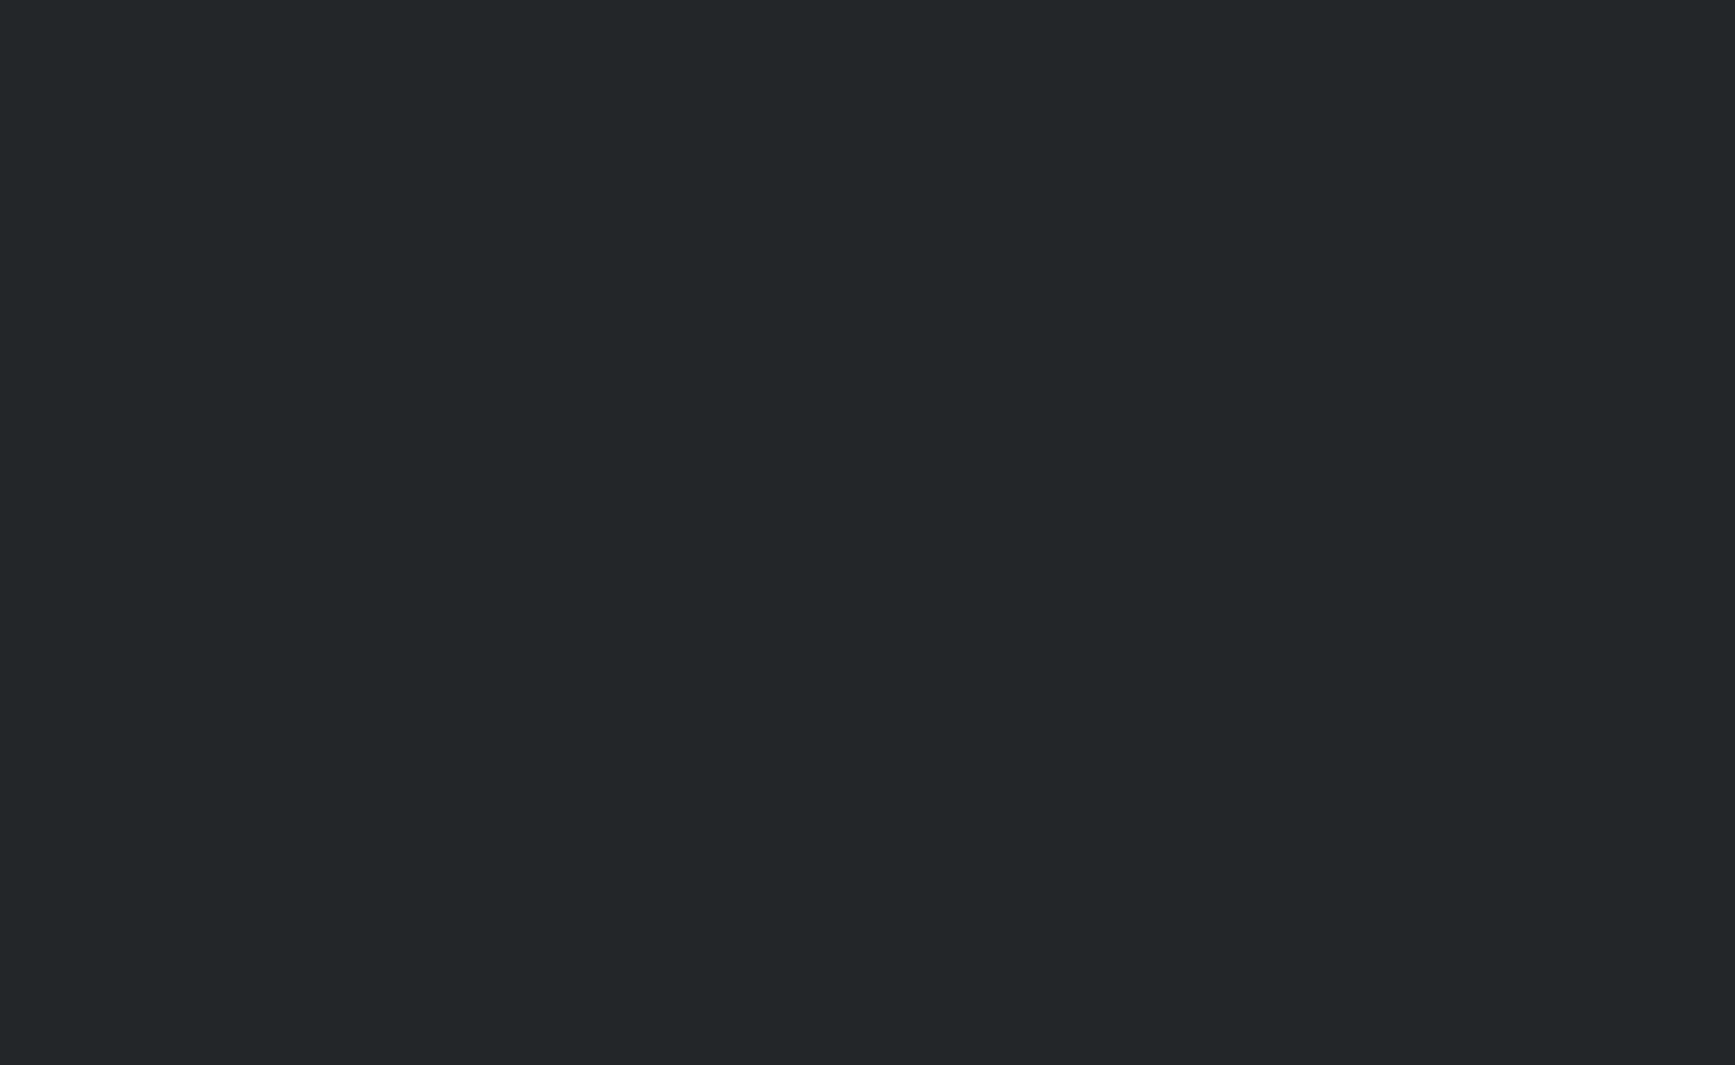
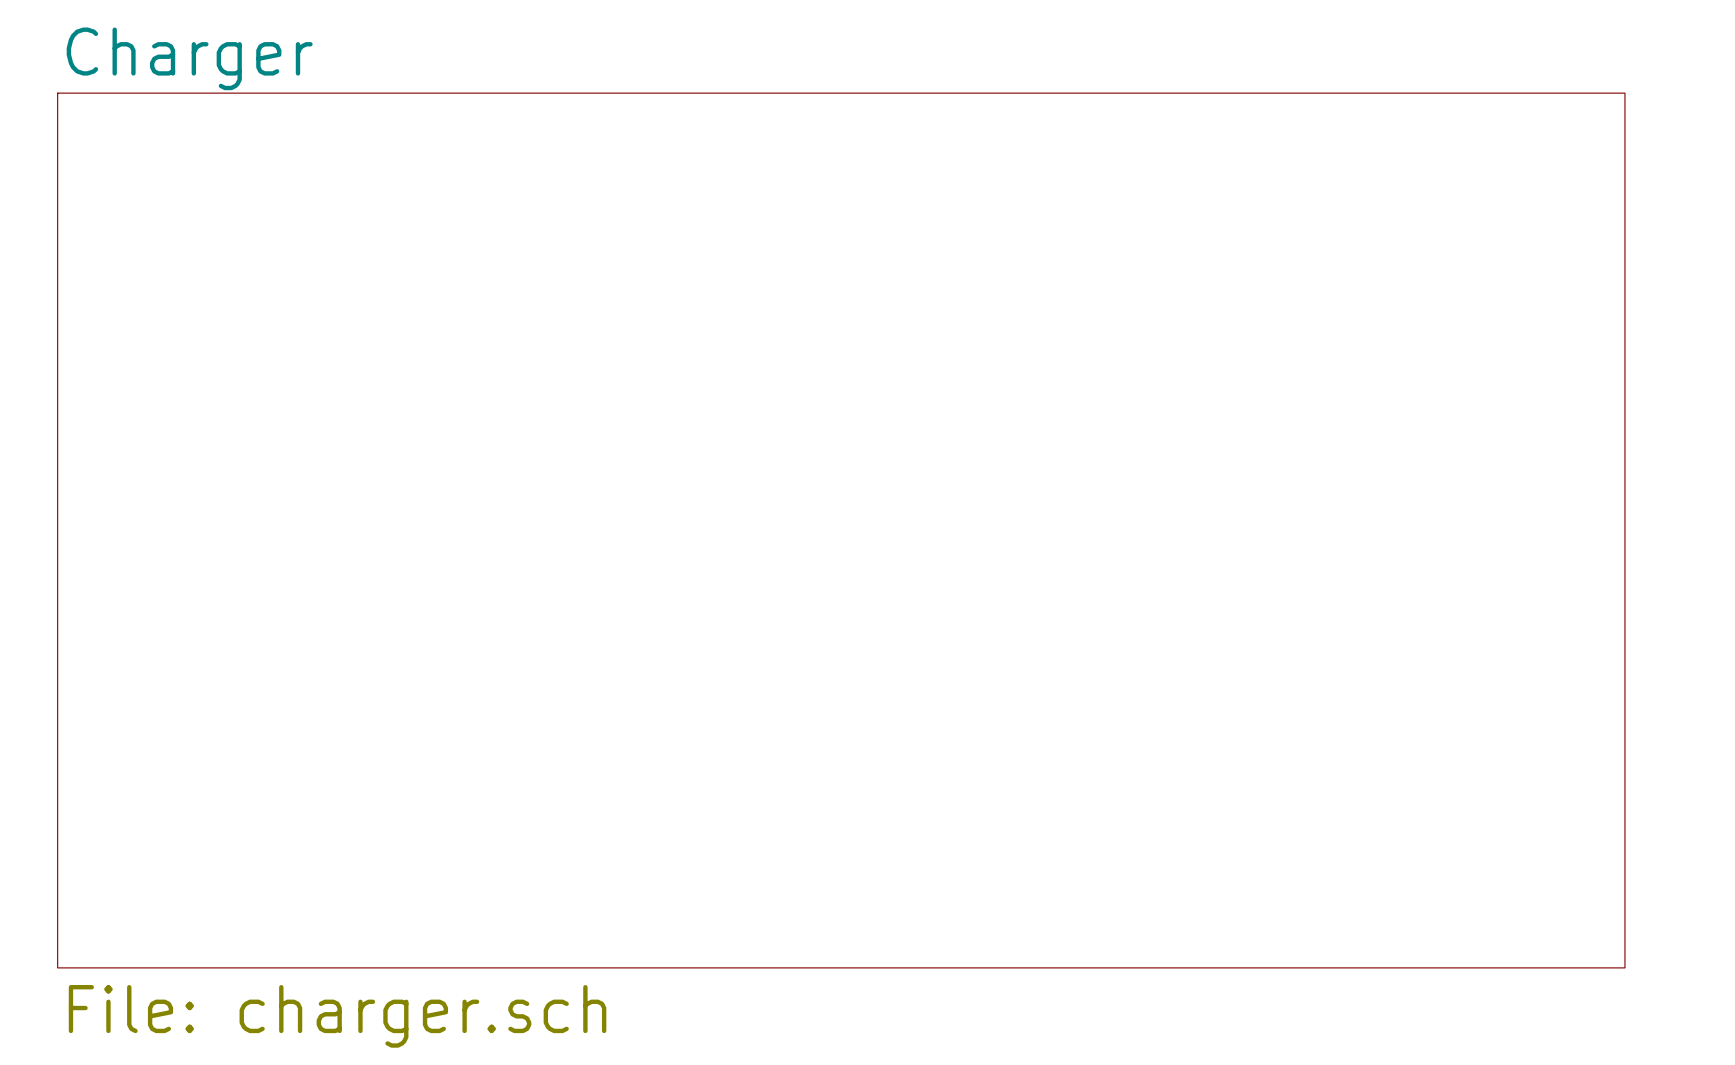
sheet Charger: none -> File: charger.sch (841, 530)

